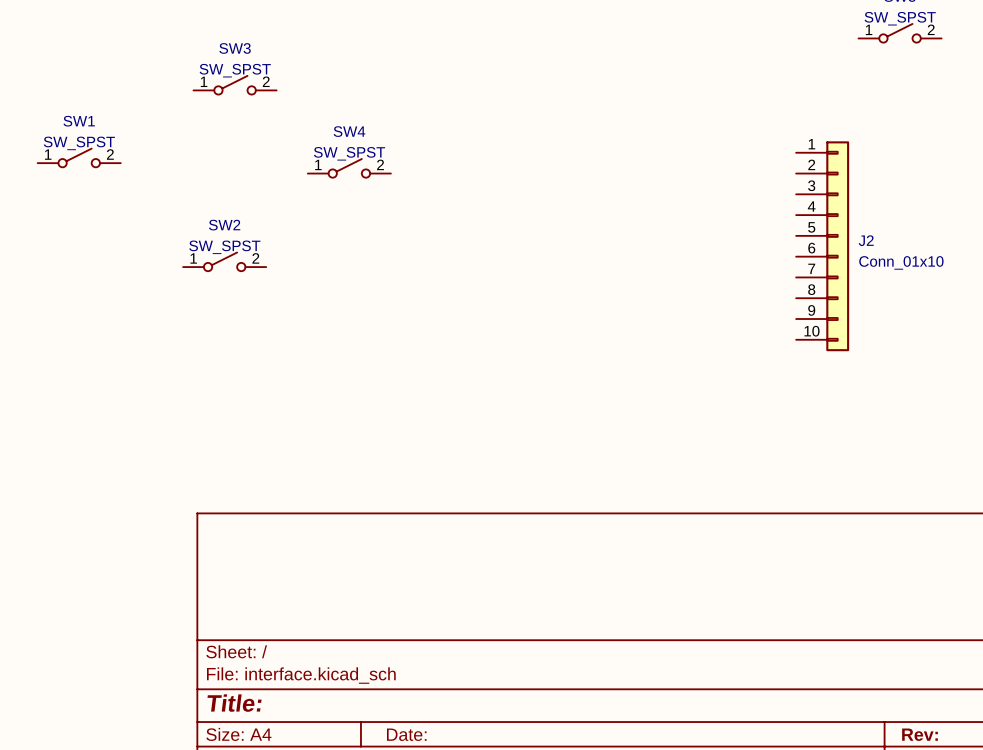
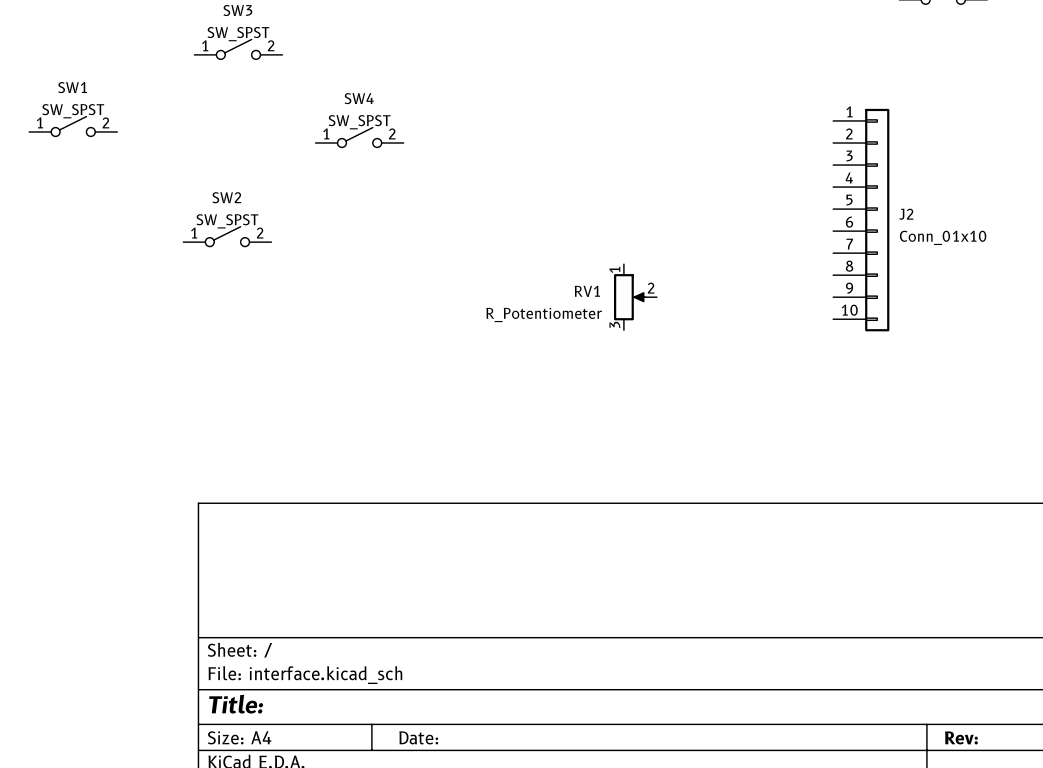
RV1: none -> R_Potentiometer (635, 297)

